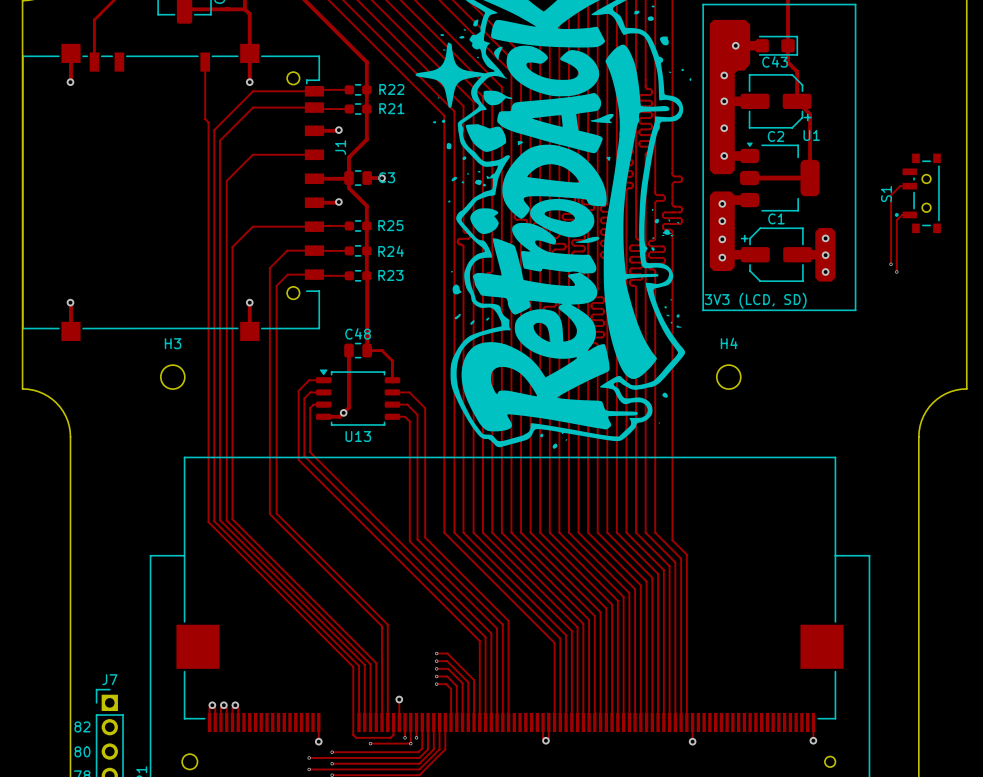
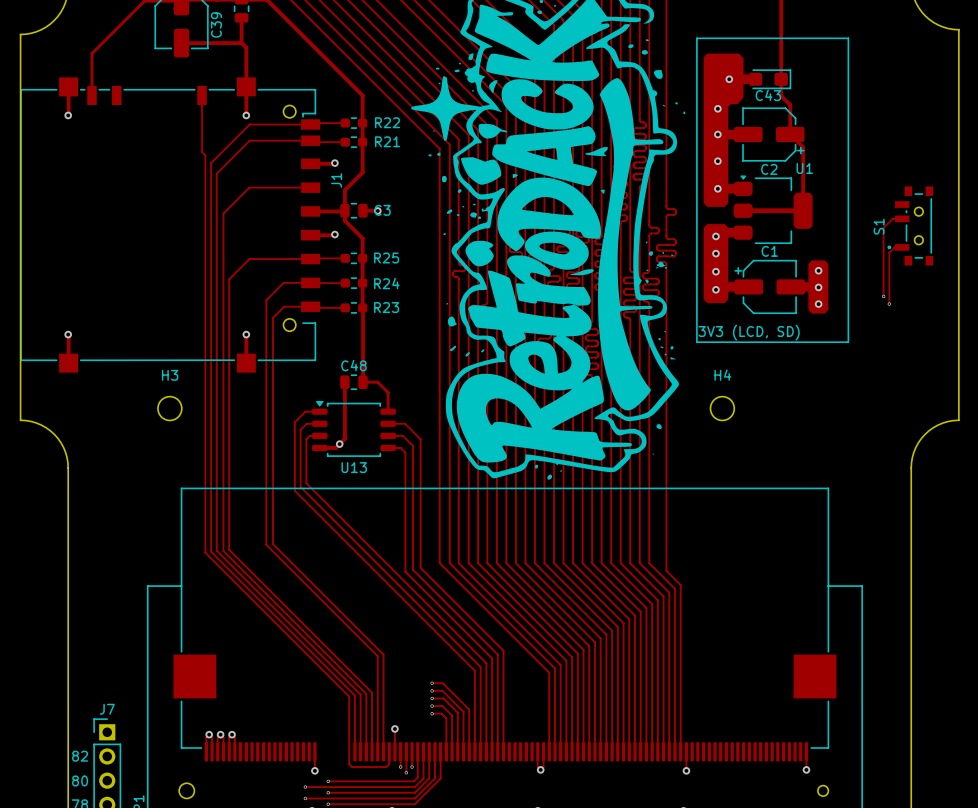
track: (370, 743) (410, 743) -> none
via: (370, 743) -> none

